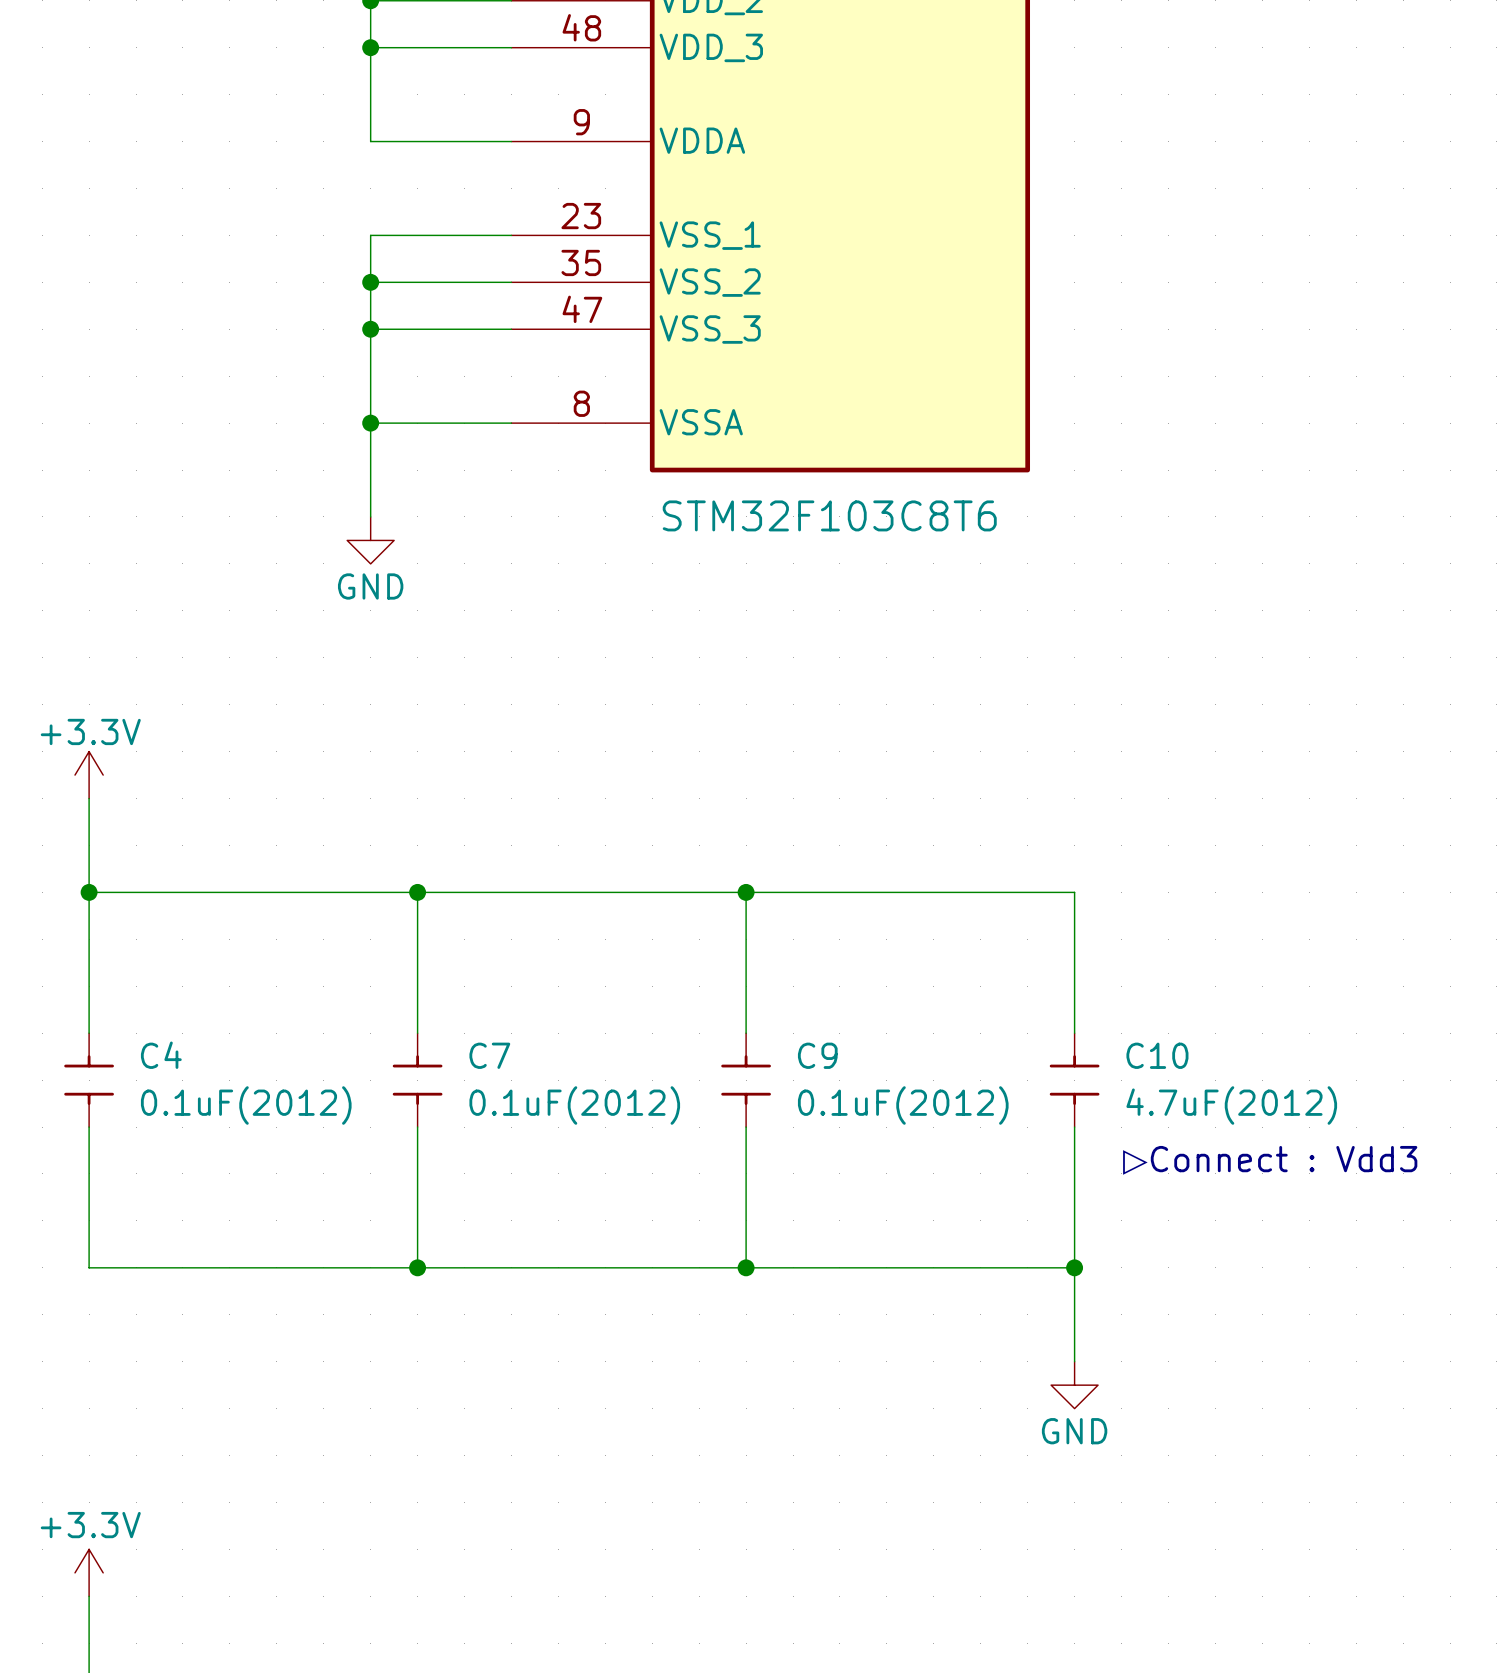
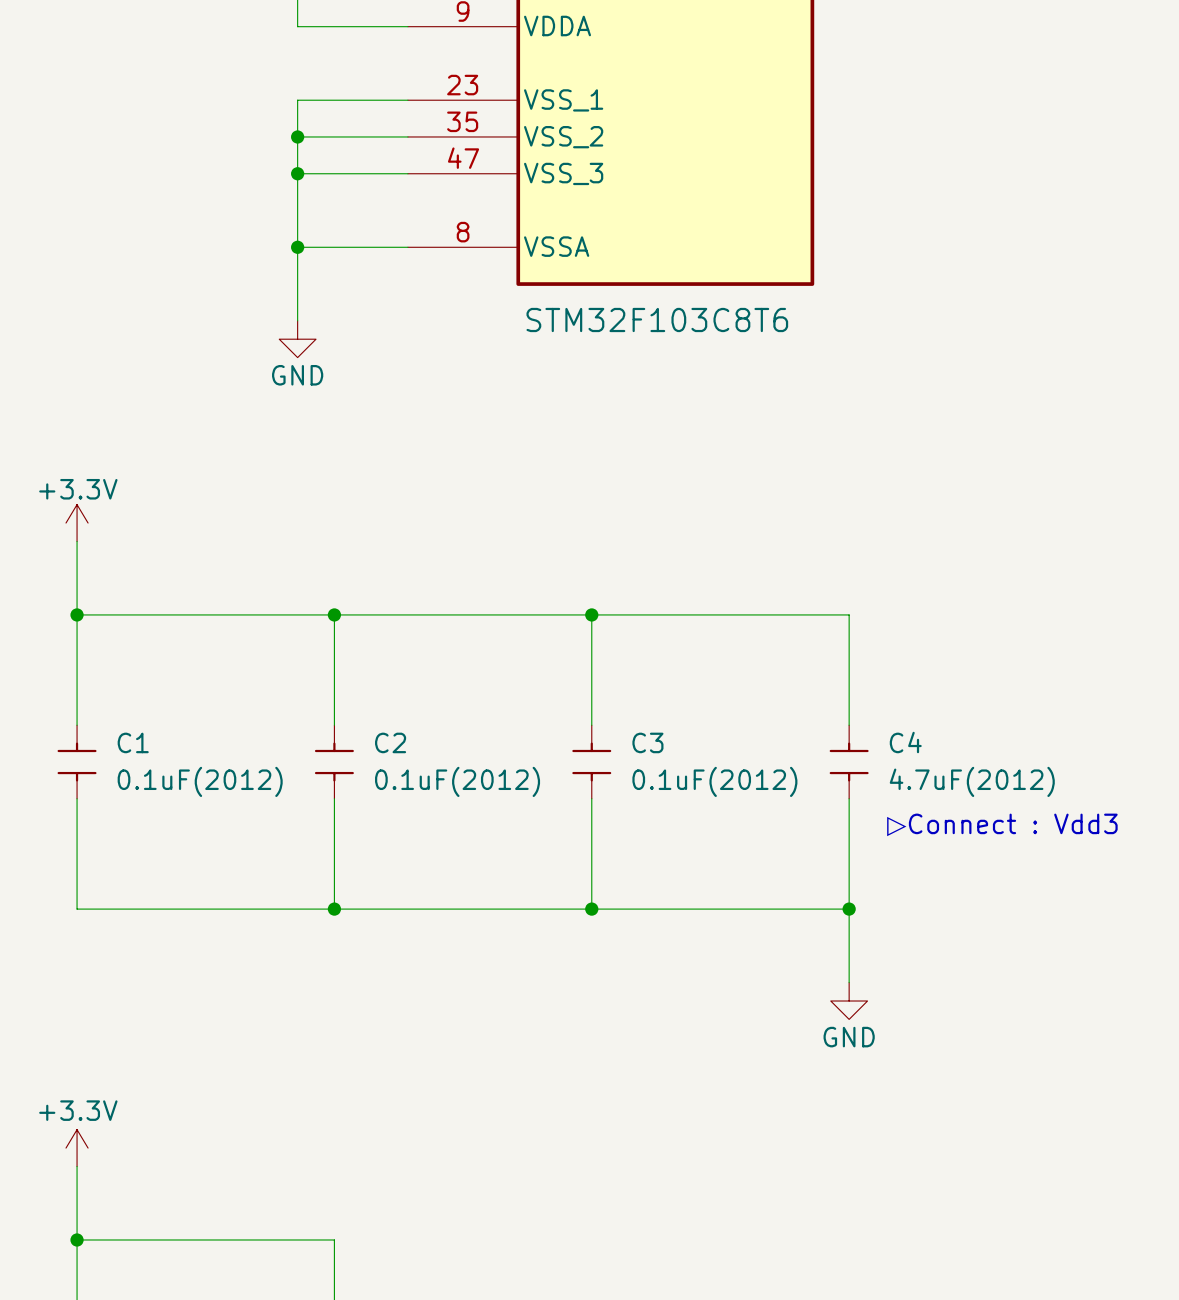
C4 name: C4 (161, 1055) -> C1 (133, 742)
C7 name: C7 (489, 1055) -> C2 (390, 742)
C9 name: C9 (817, 1055) -> C3 (647, 742)
C10 name: C10 (1157, 1055) -> C4 (905, 742)

